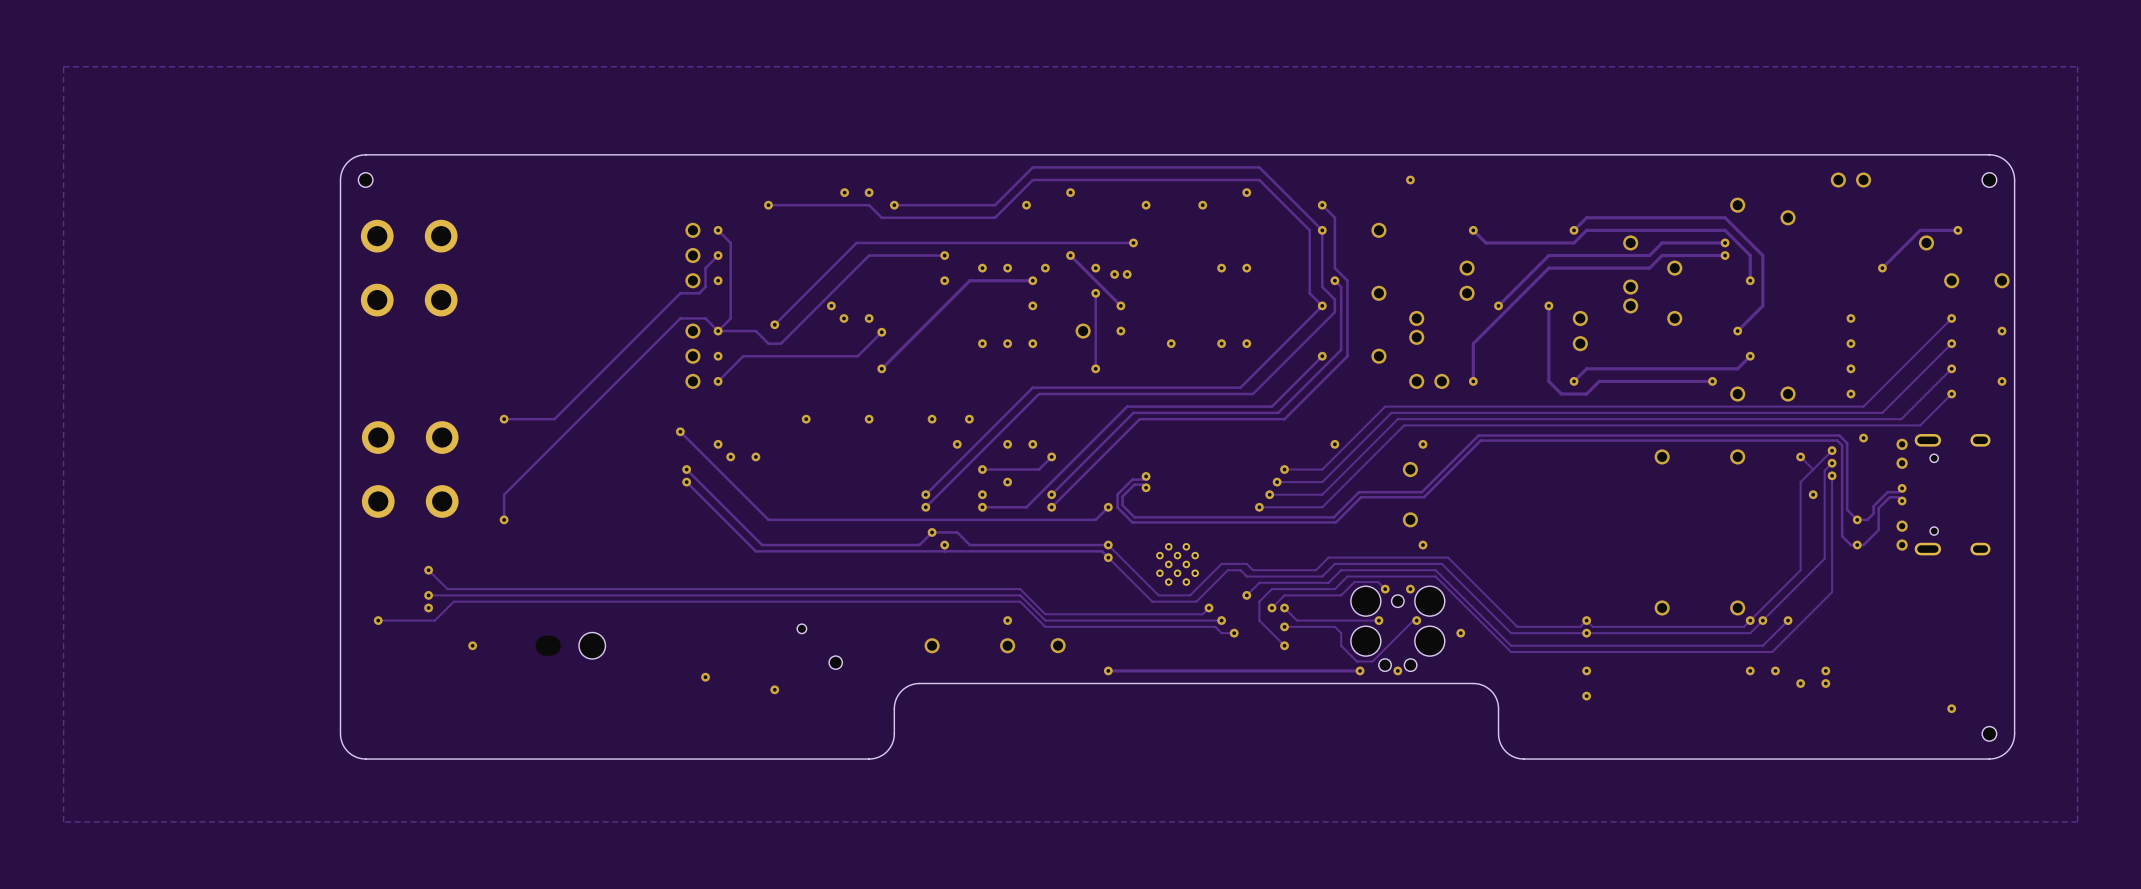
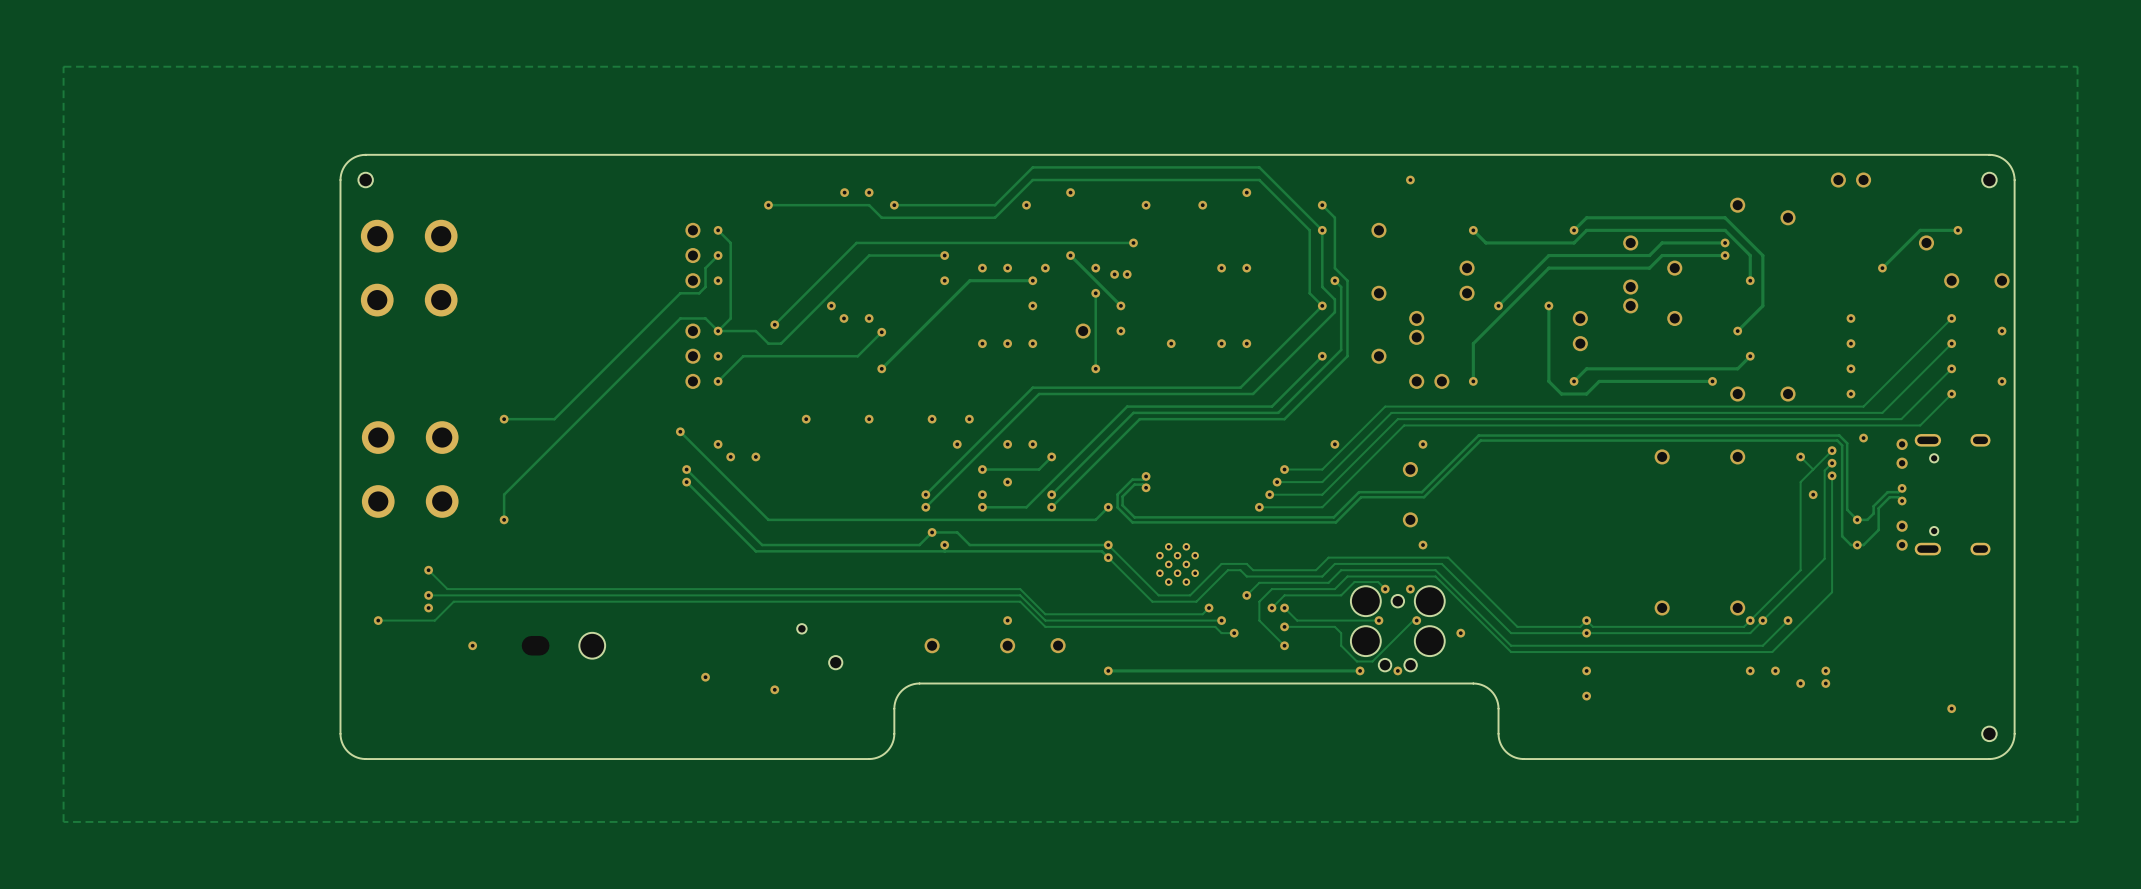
part footprint: [535, 632, 606, 659] -> [521, 632, 606, 659]

